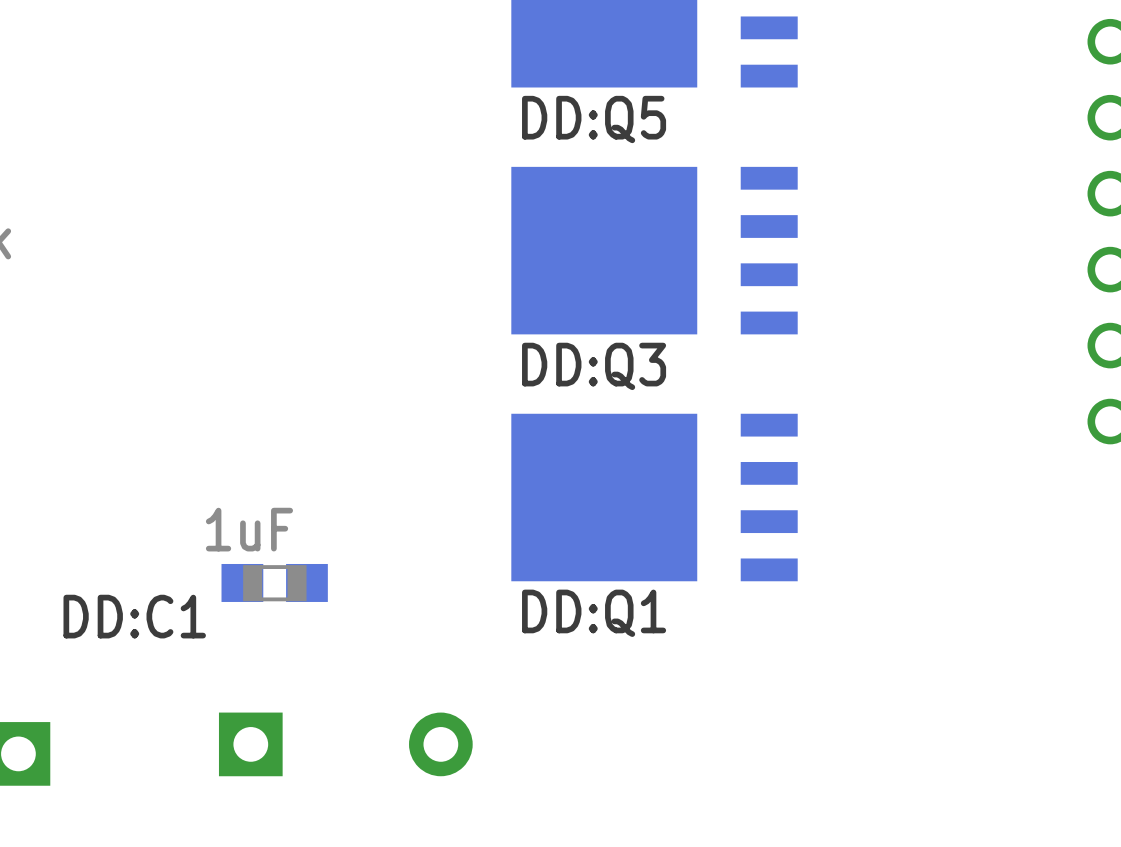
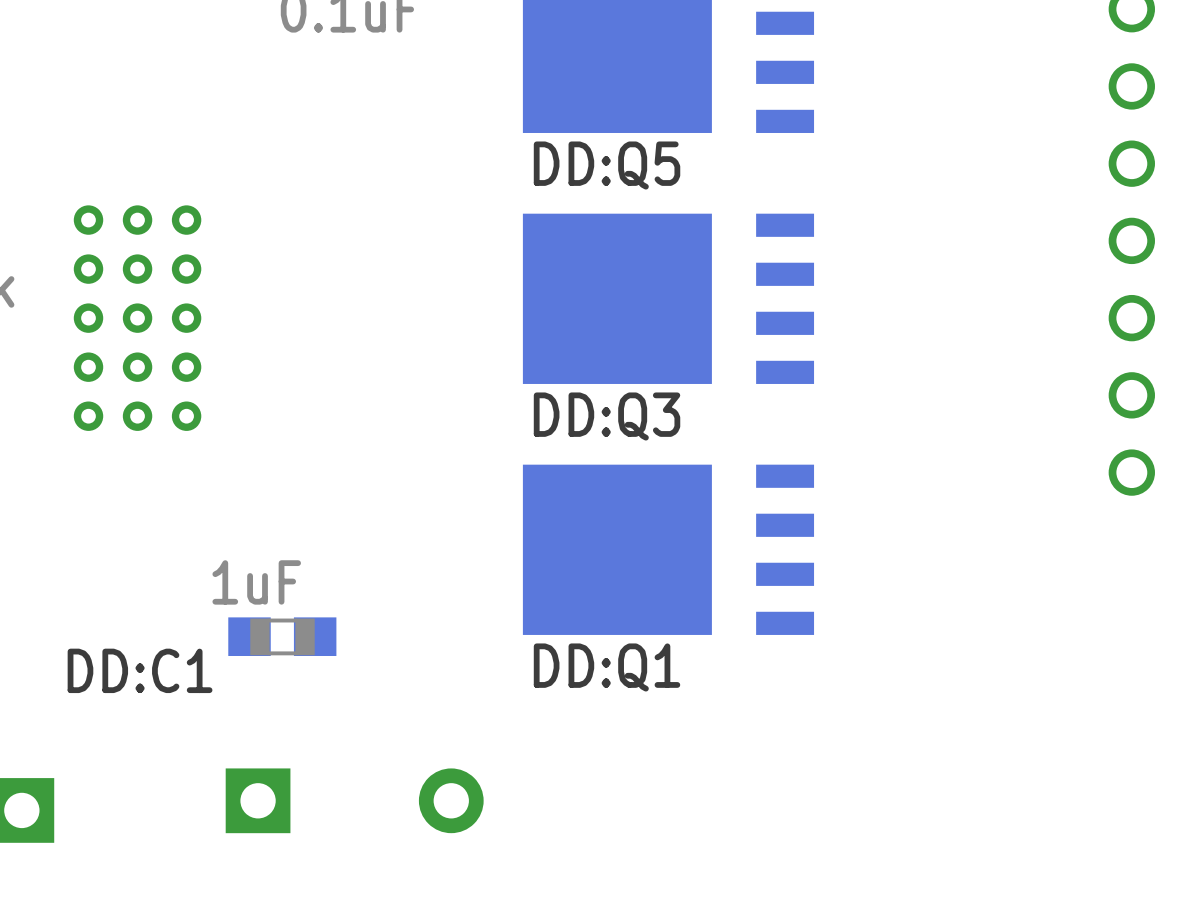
part: none -> (137, 318)

